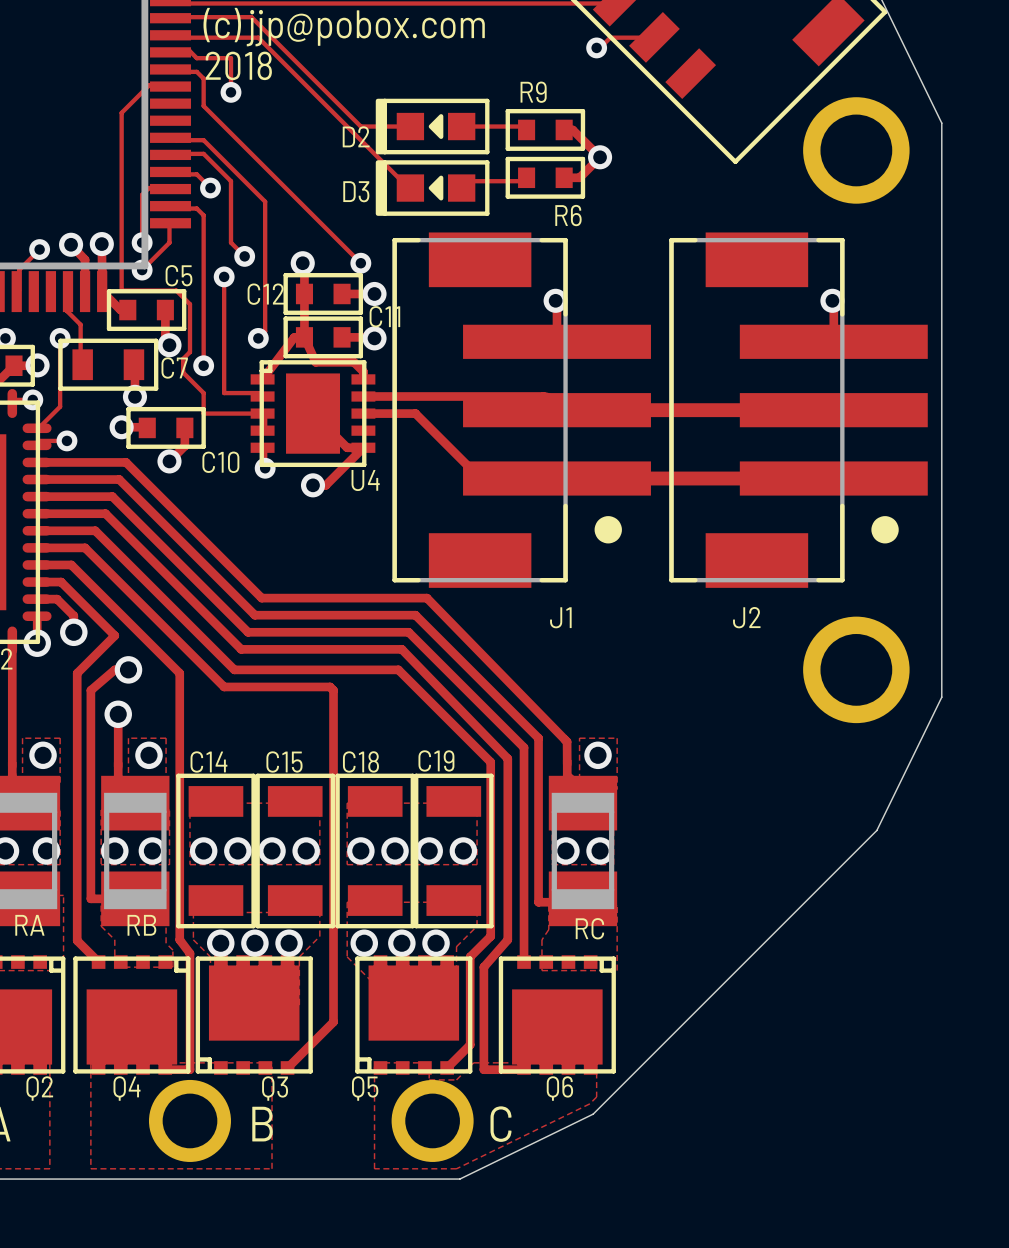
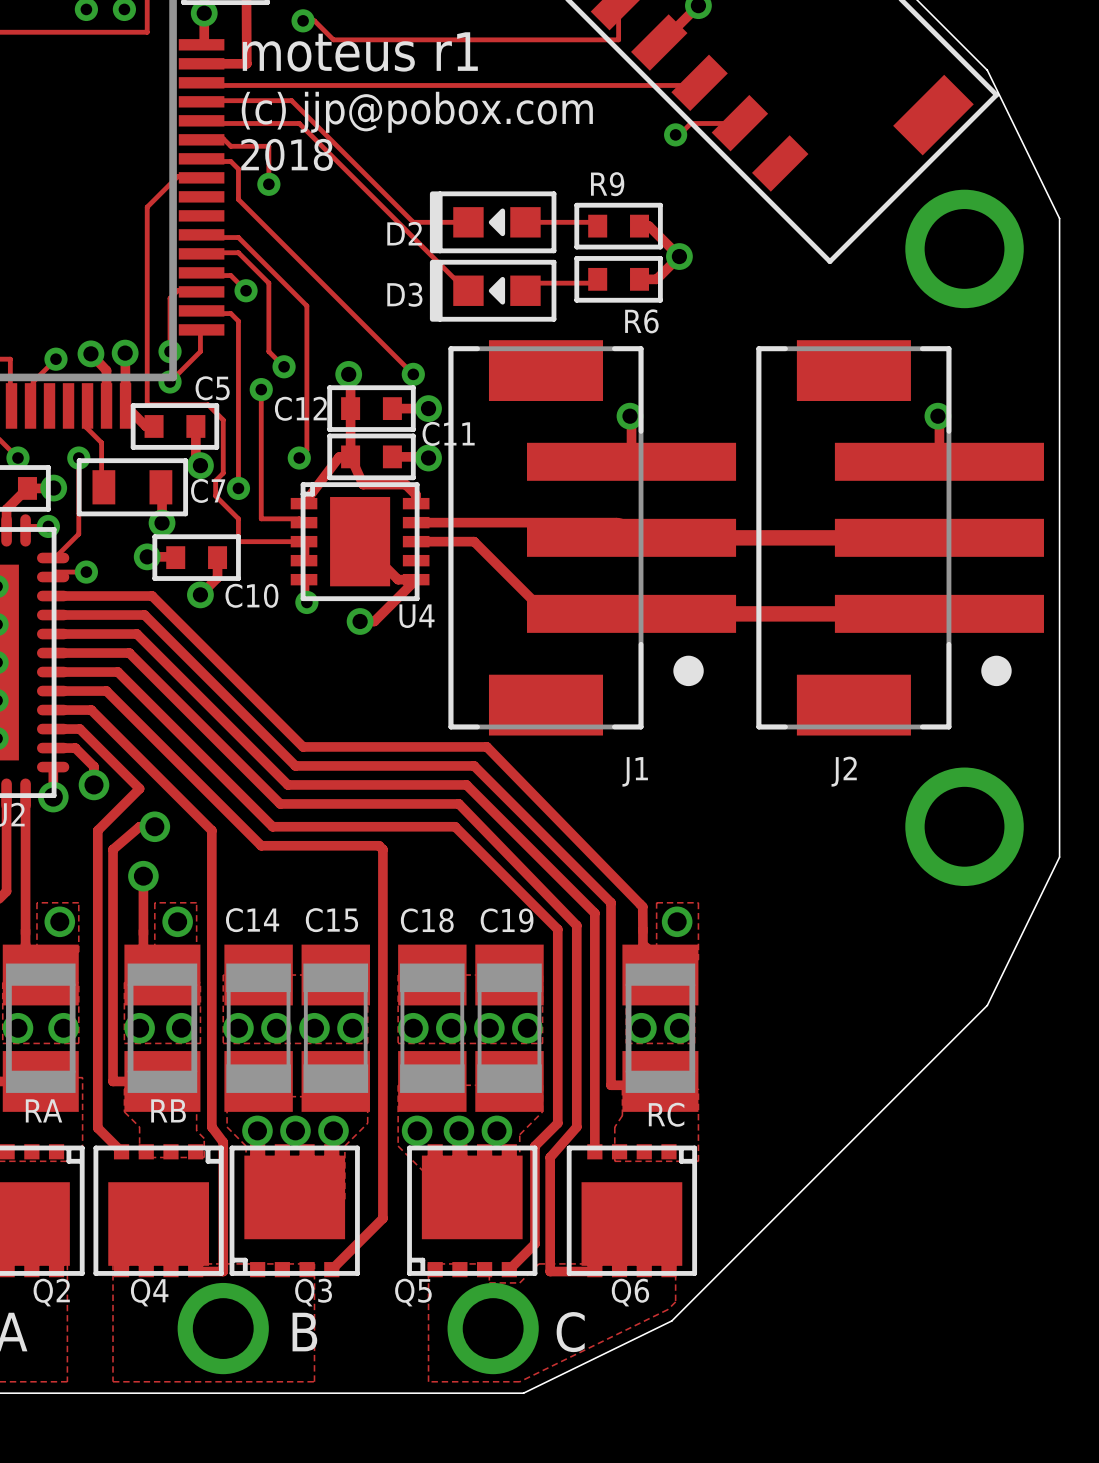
C14 footprint: [176, 773, 256, 929] -> [224, 944, 293, 1112]
C15 footprint: [255, 773, 336, 929] -> [301, 944, 370, 1112]
C18 footprint: [335, 773, 415, 929] -> [398, 944, 467, 1112]
C19 footprint: [414, 773, 494, 929] -> [475, 944, 544, 1112]

